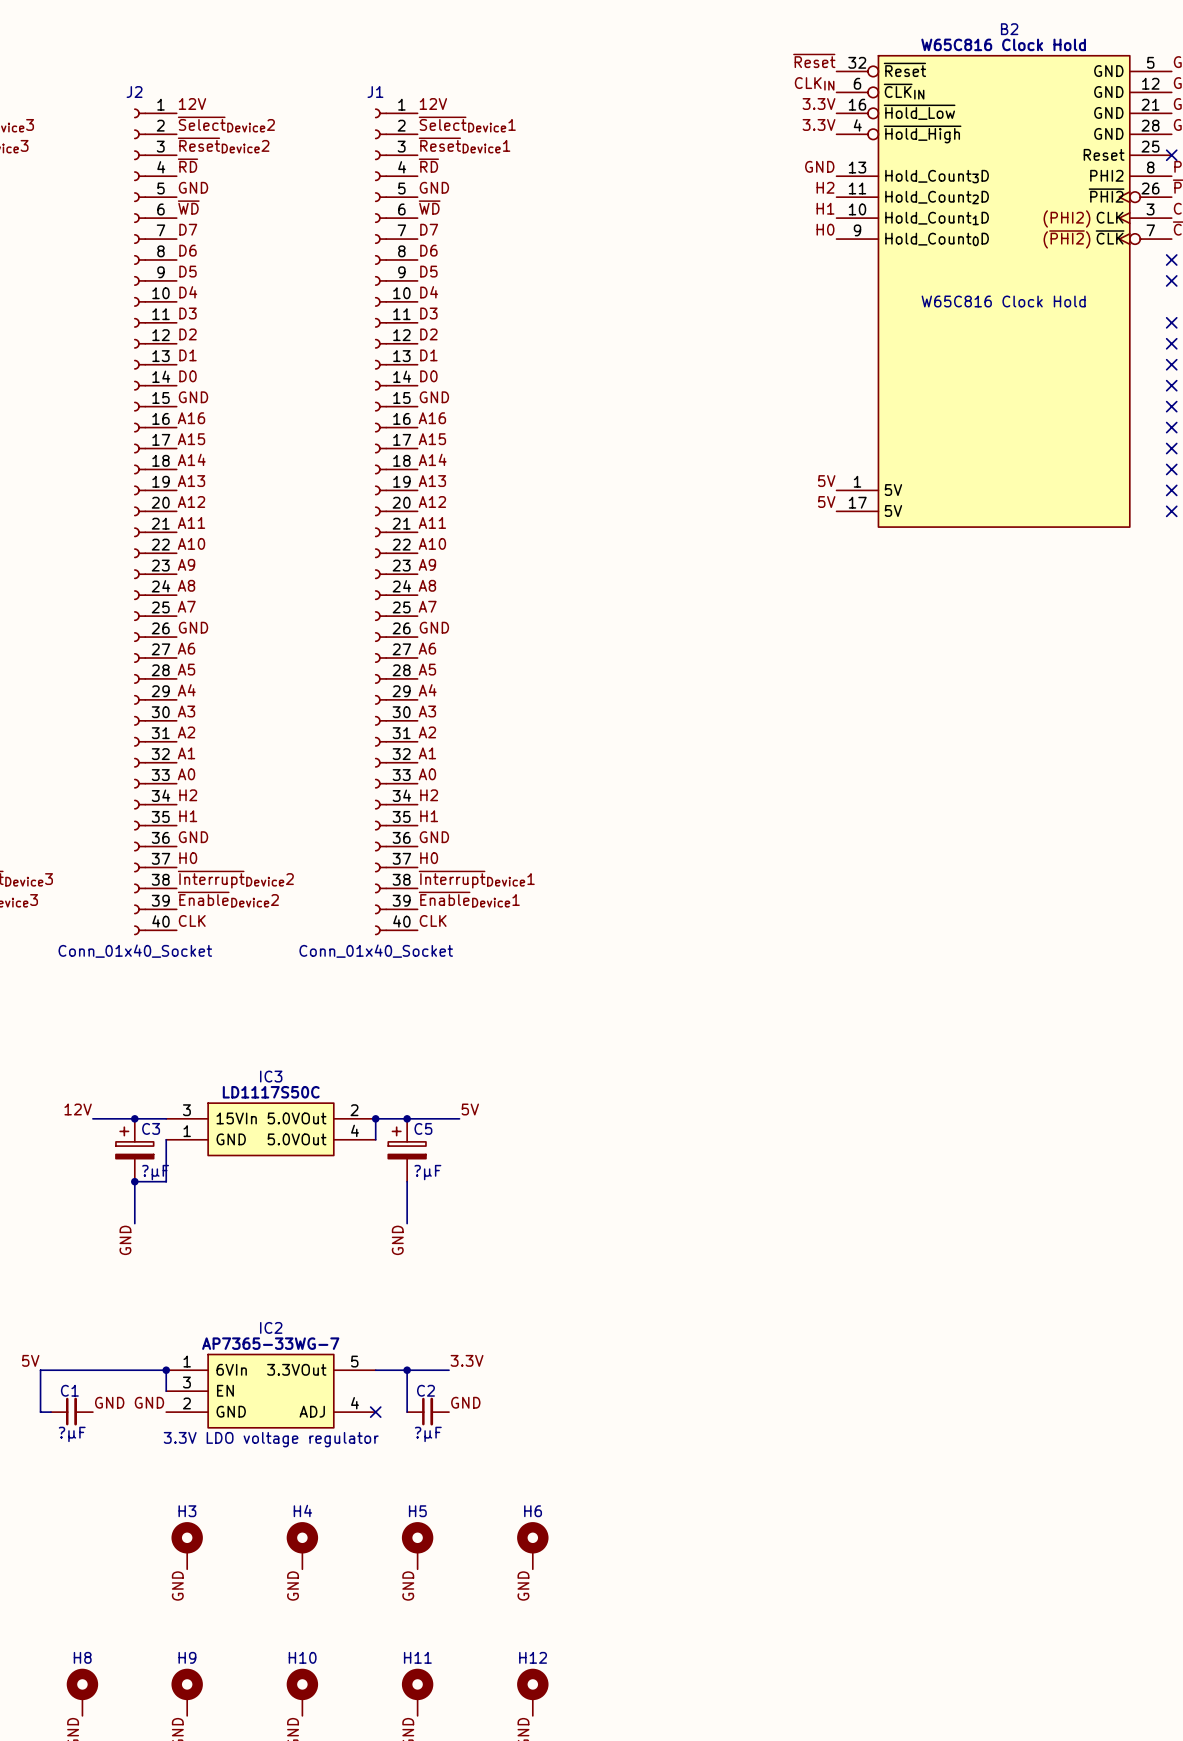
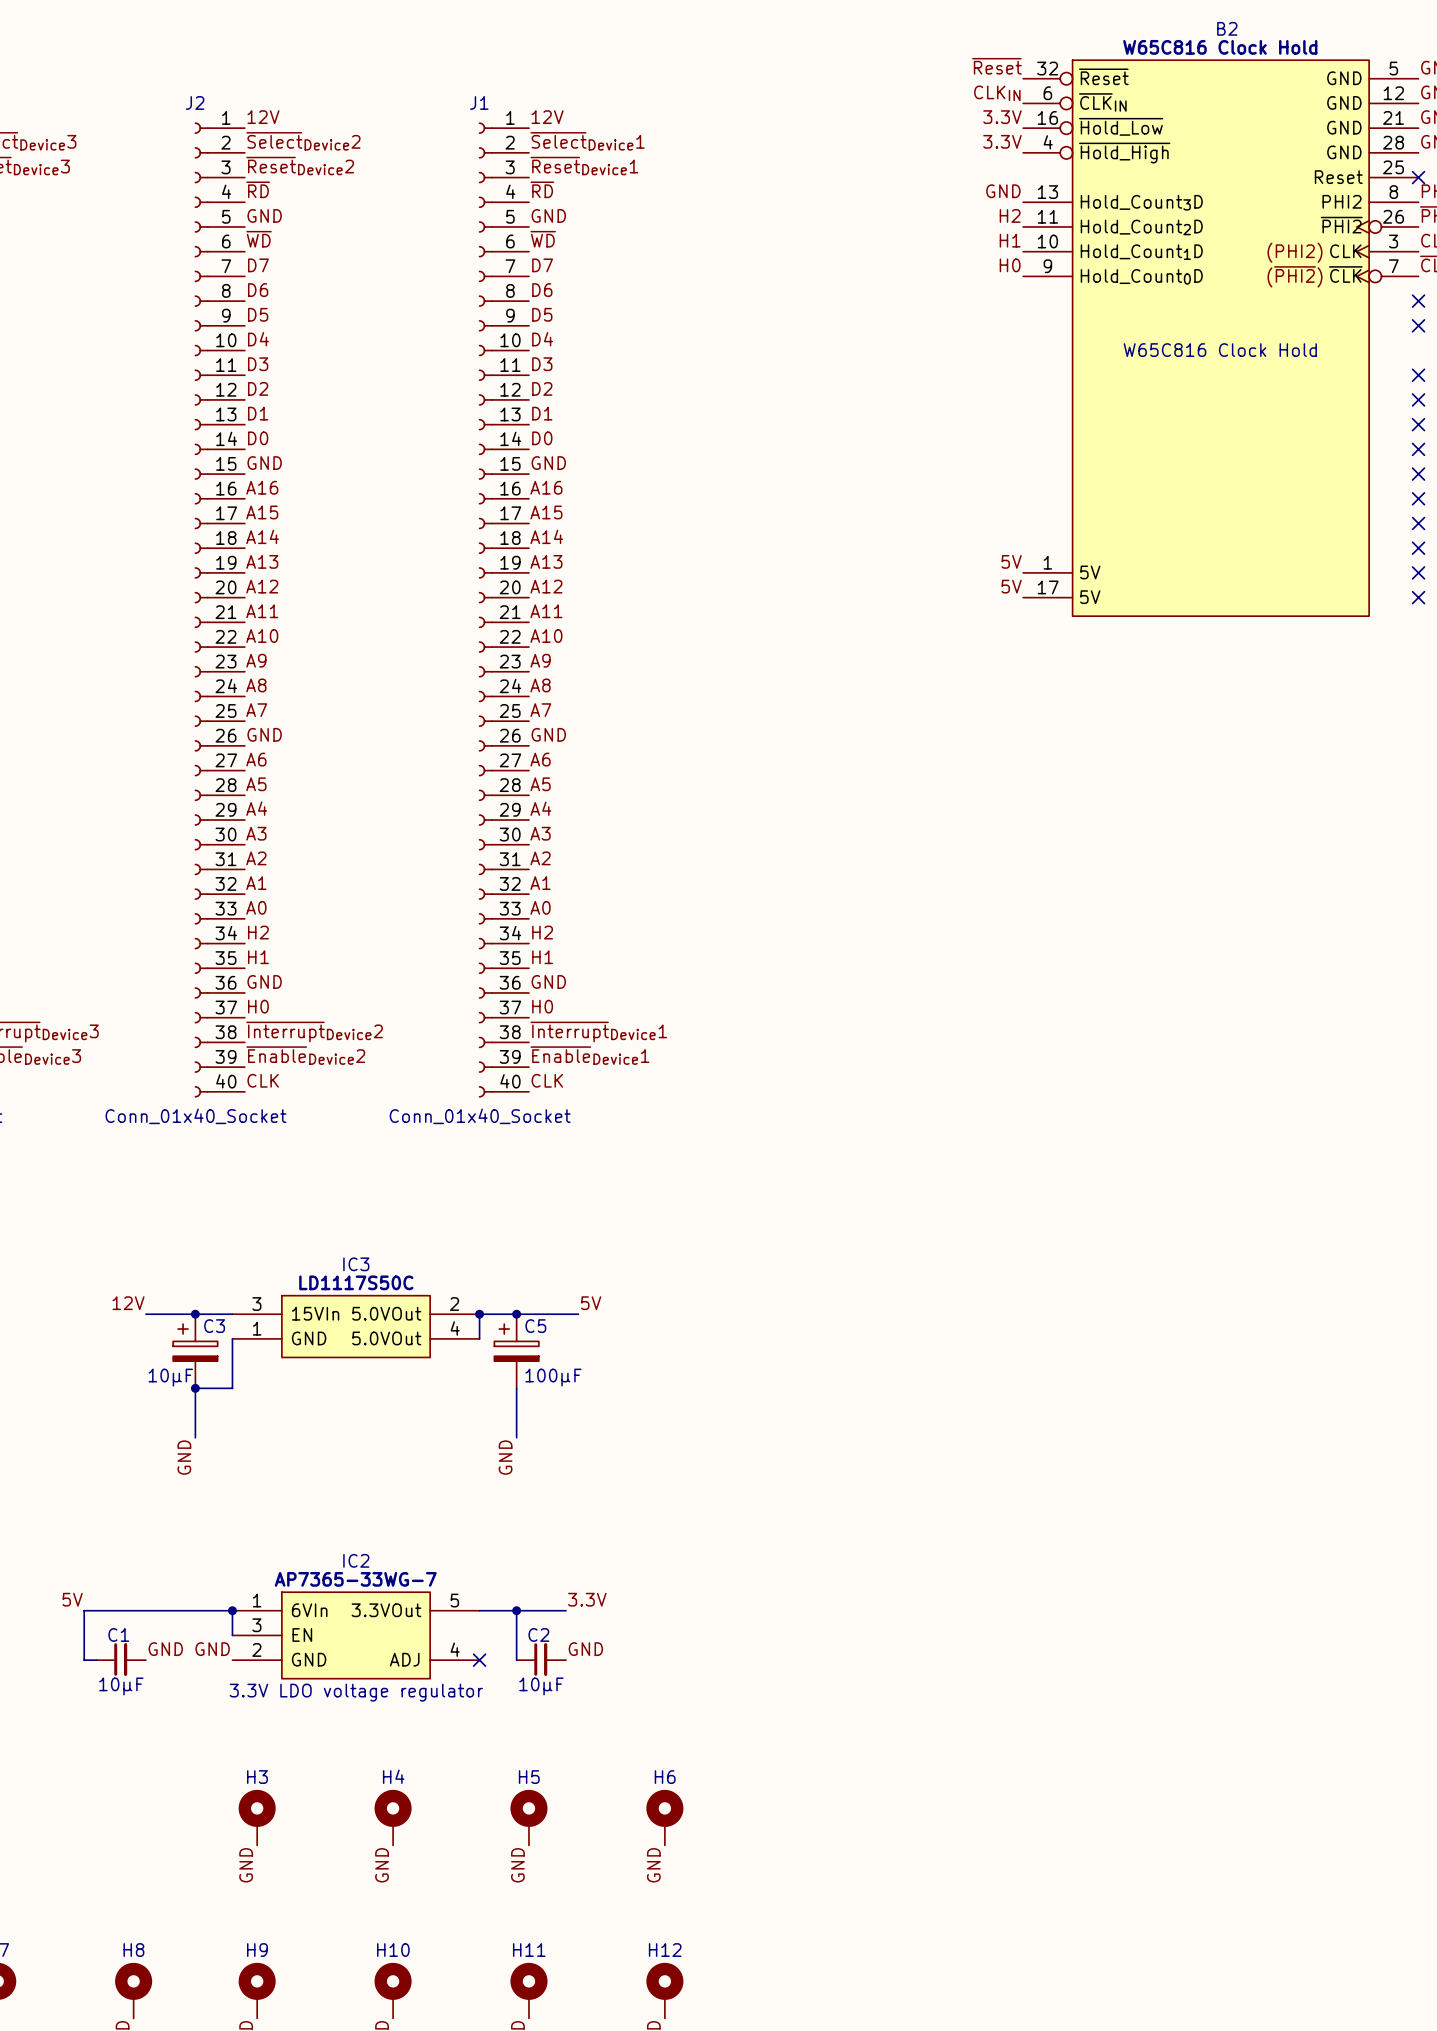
C3 value: ?μF (155, 1172) -> 10μF (170, 1377)
C5 value: ?μF (427, 1172) -> 100μF (553, 1377)
C1 value: ?μF (72, 1434) -> 10µF (121, 1686)
C2 value: ?μF (428, 1434) -> 10µF (541, 1686)

